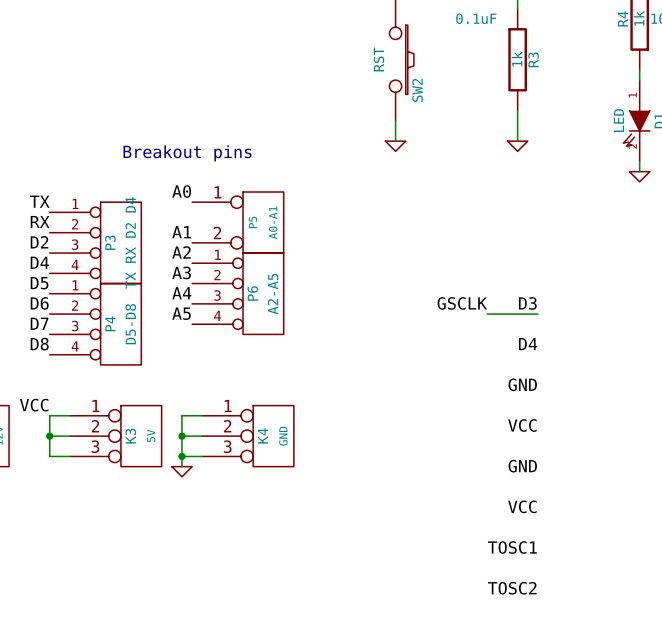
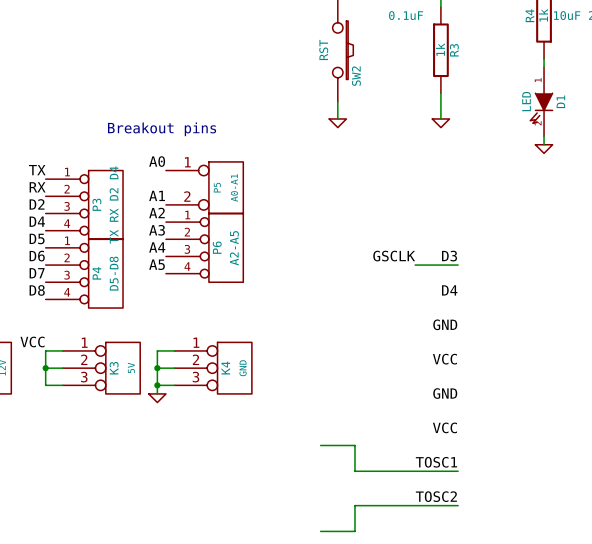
wire: none -> (320, 445) (355, 445) (355, 471) (458, 471)
wire: none -> (458, 505) (355, 505) (355, 531) (320, 531)

